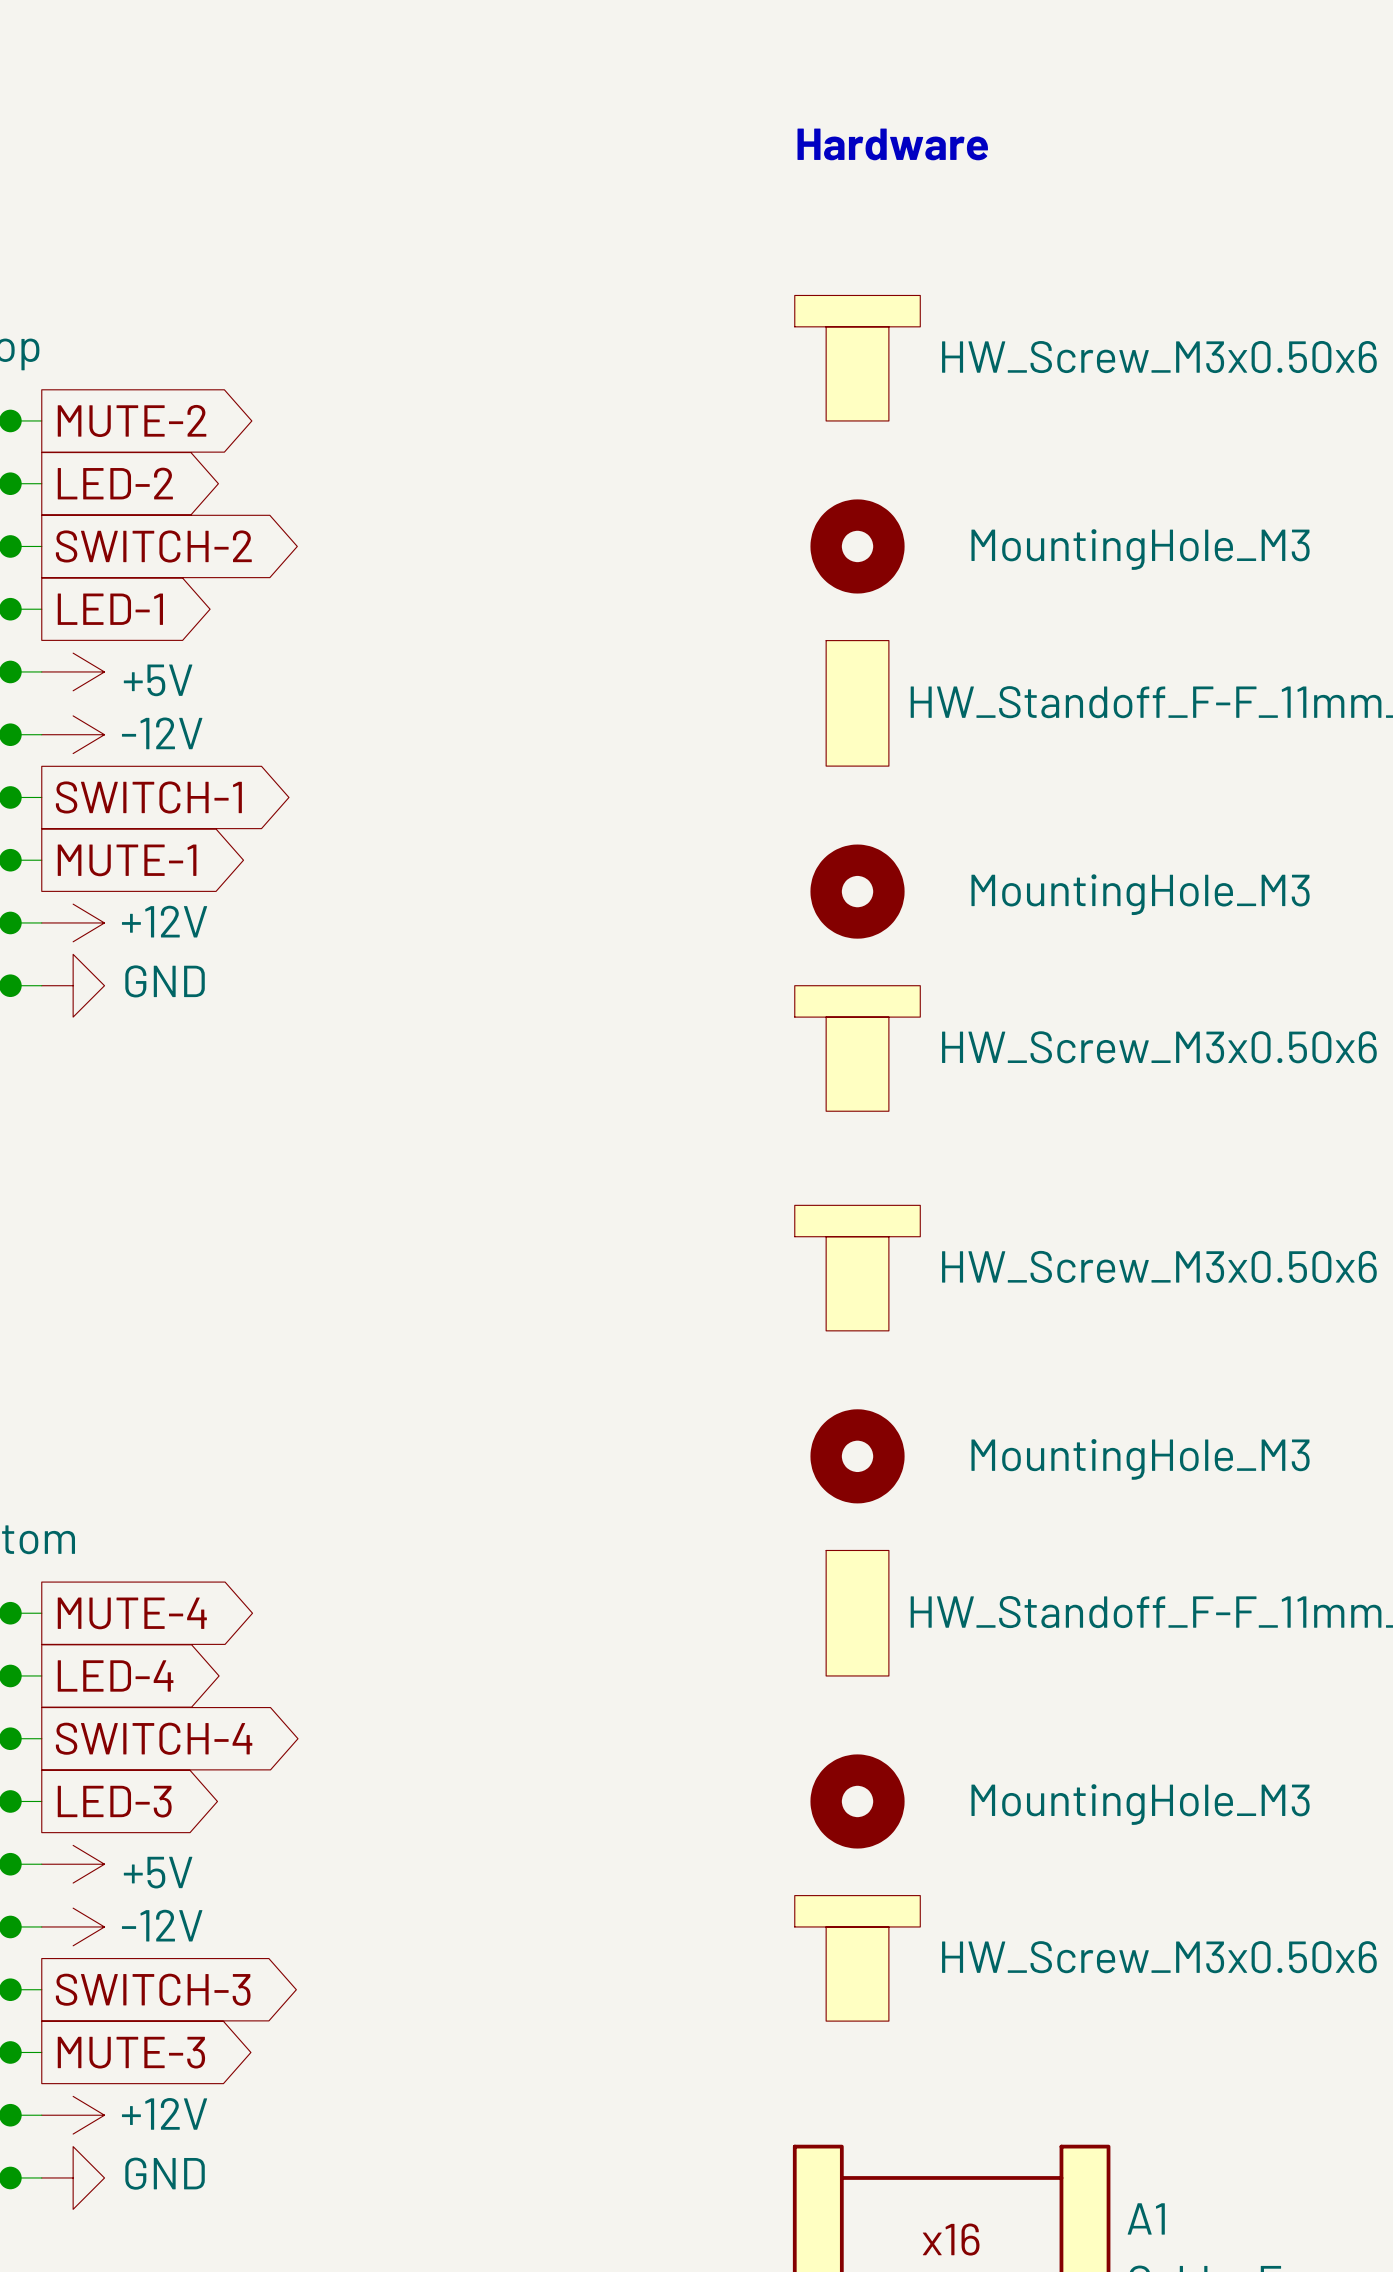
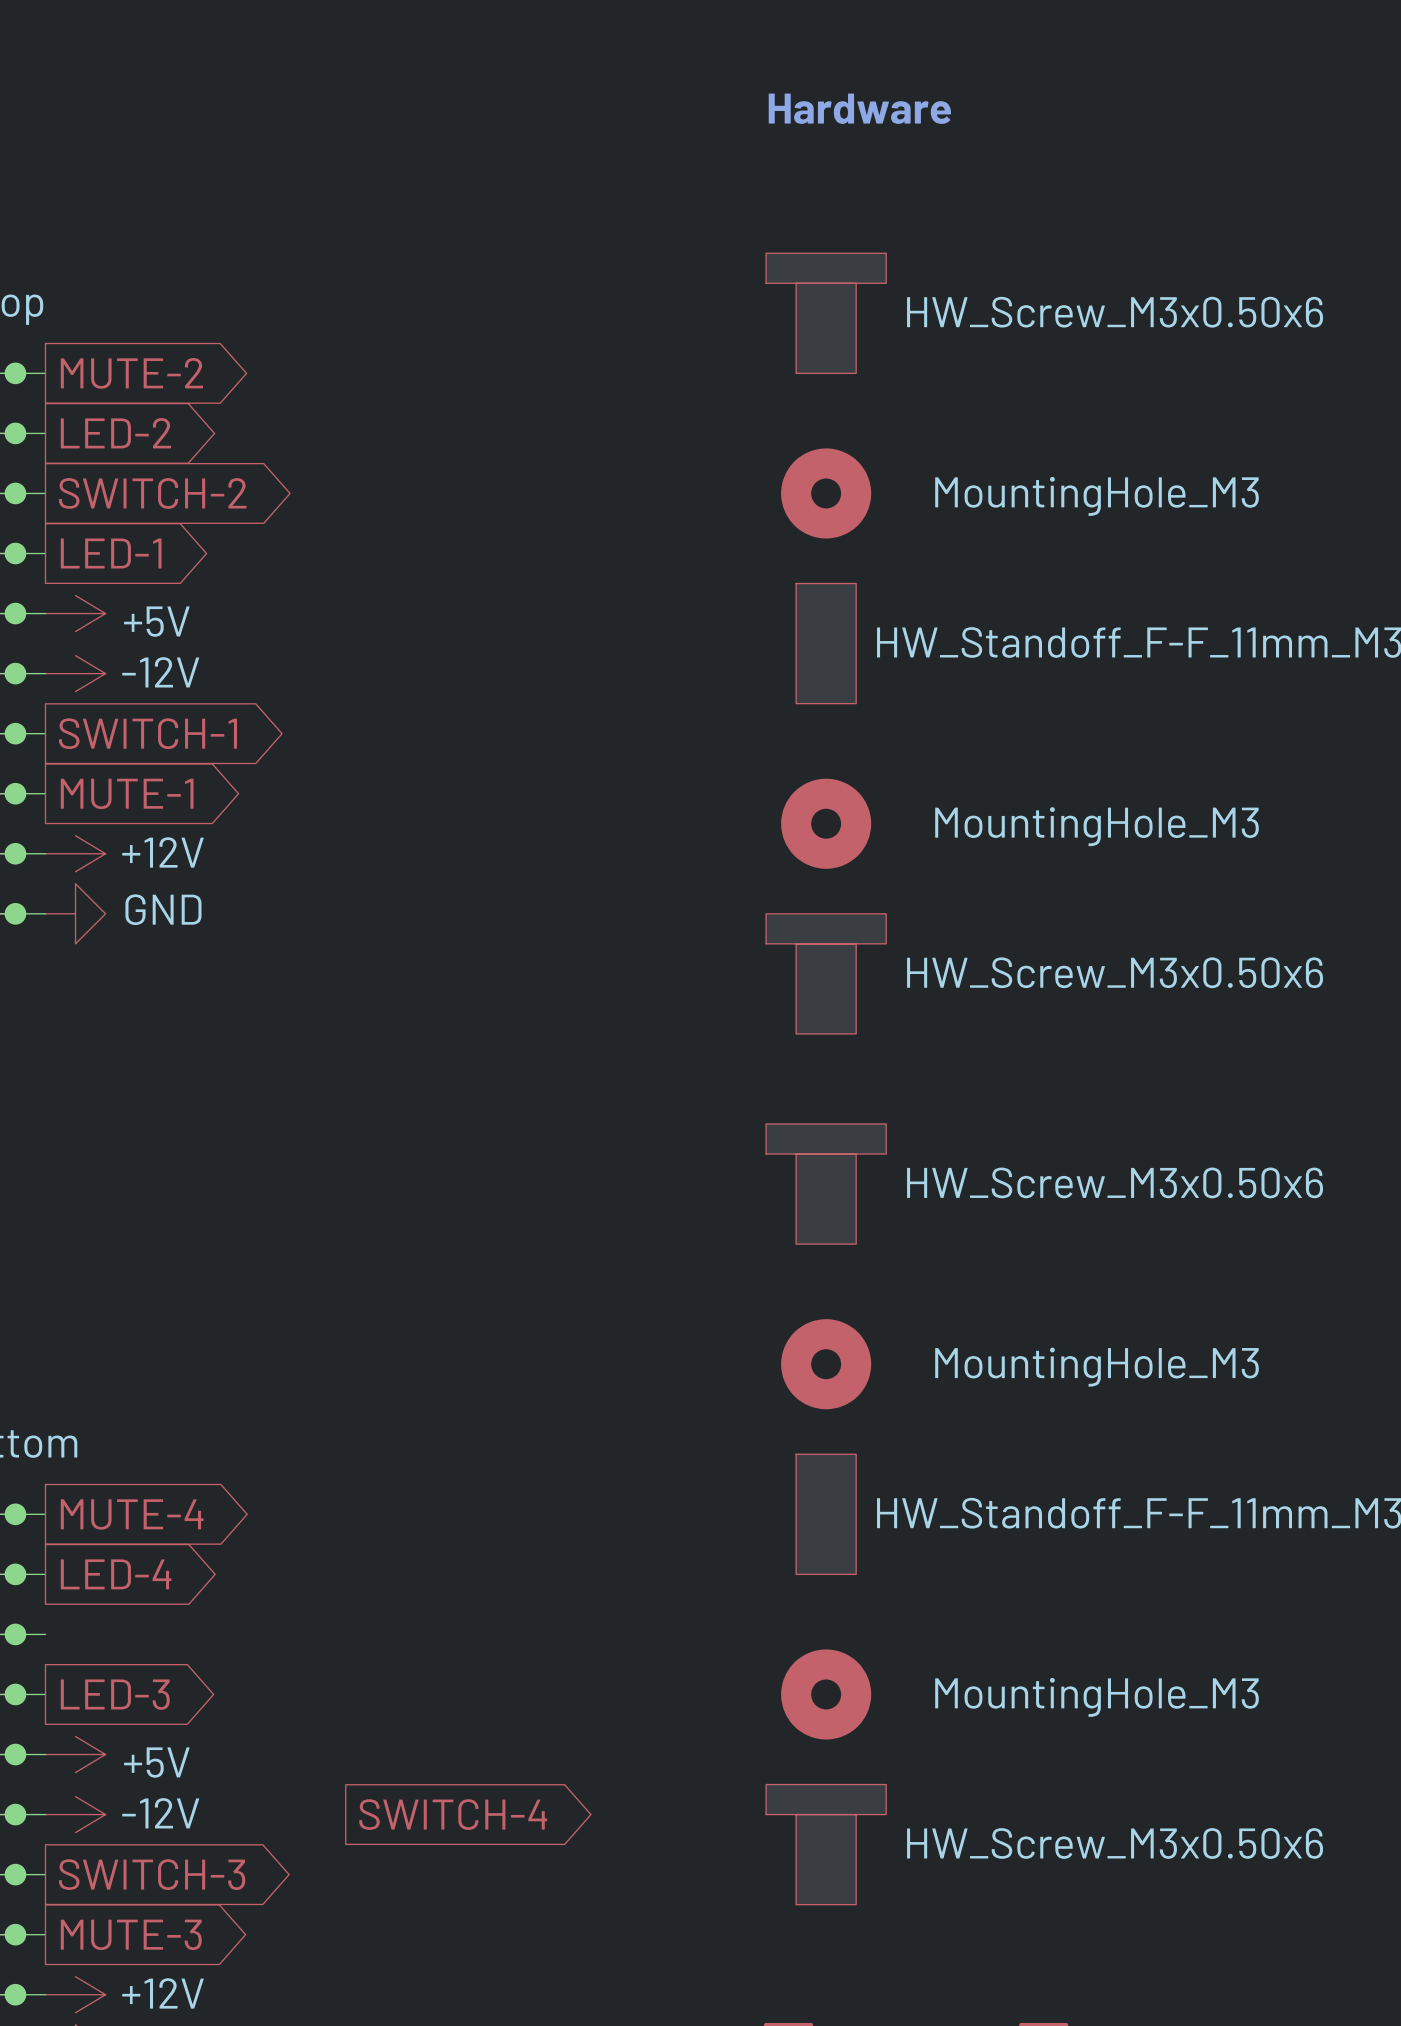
global label position: SWITCH-4 (154, 1738) -> SWITCH-4 (453, 1814)

